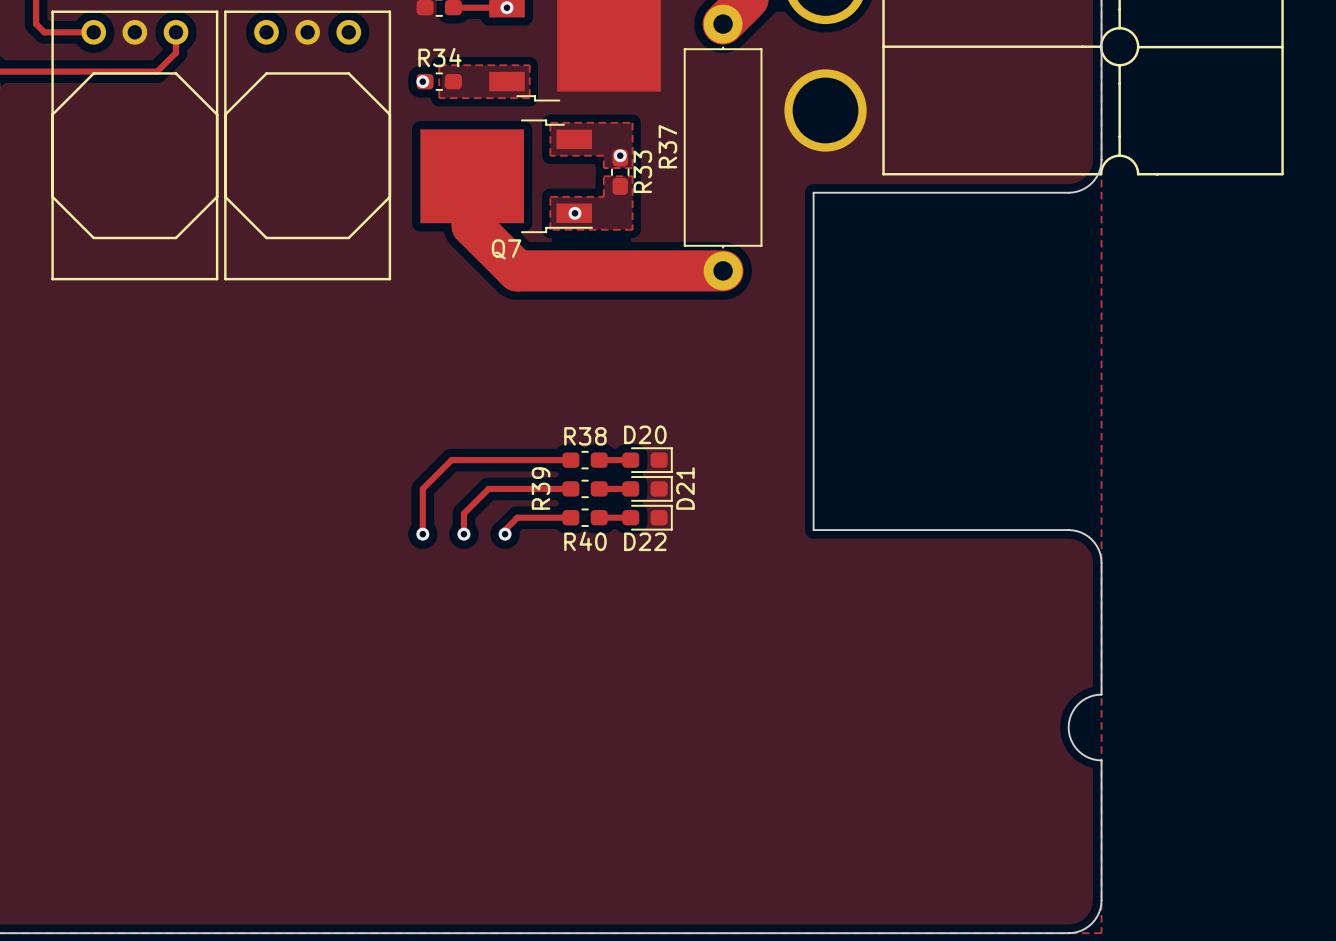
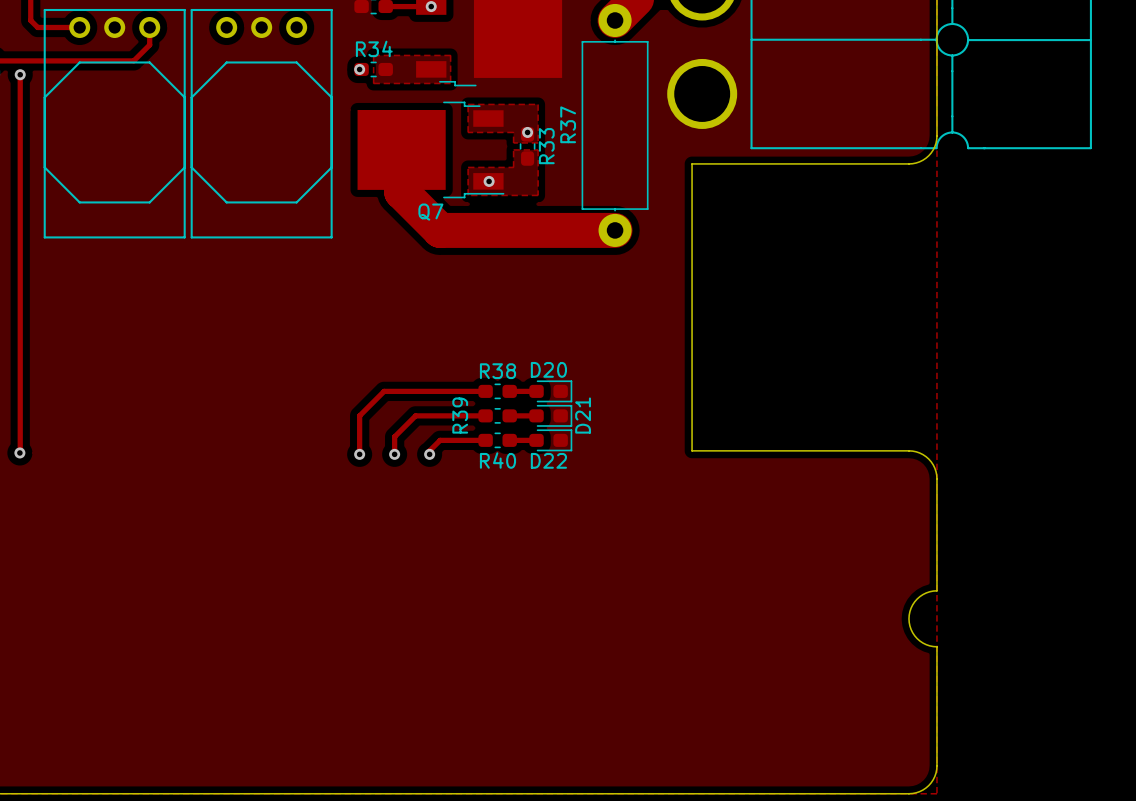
track: none -> (20, 74) (19, 452)
via: none -> (20, 74)
via: none -> (19, 452)

